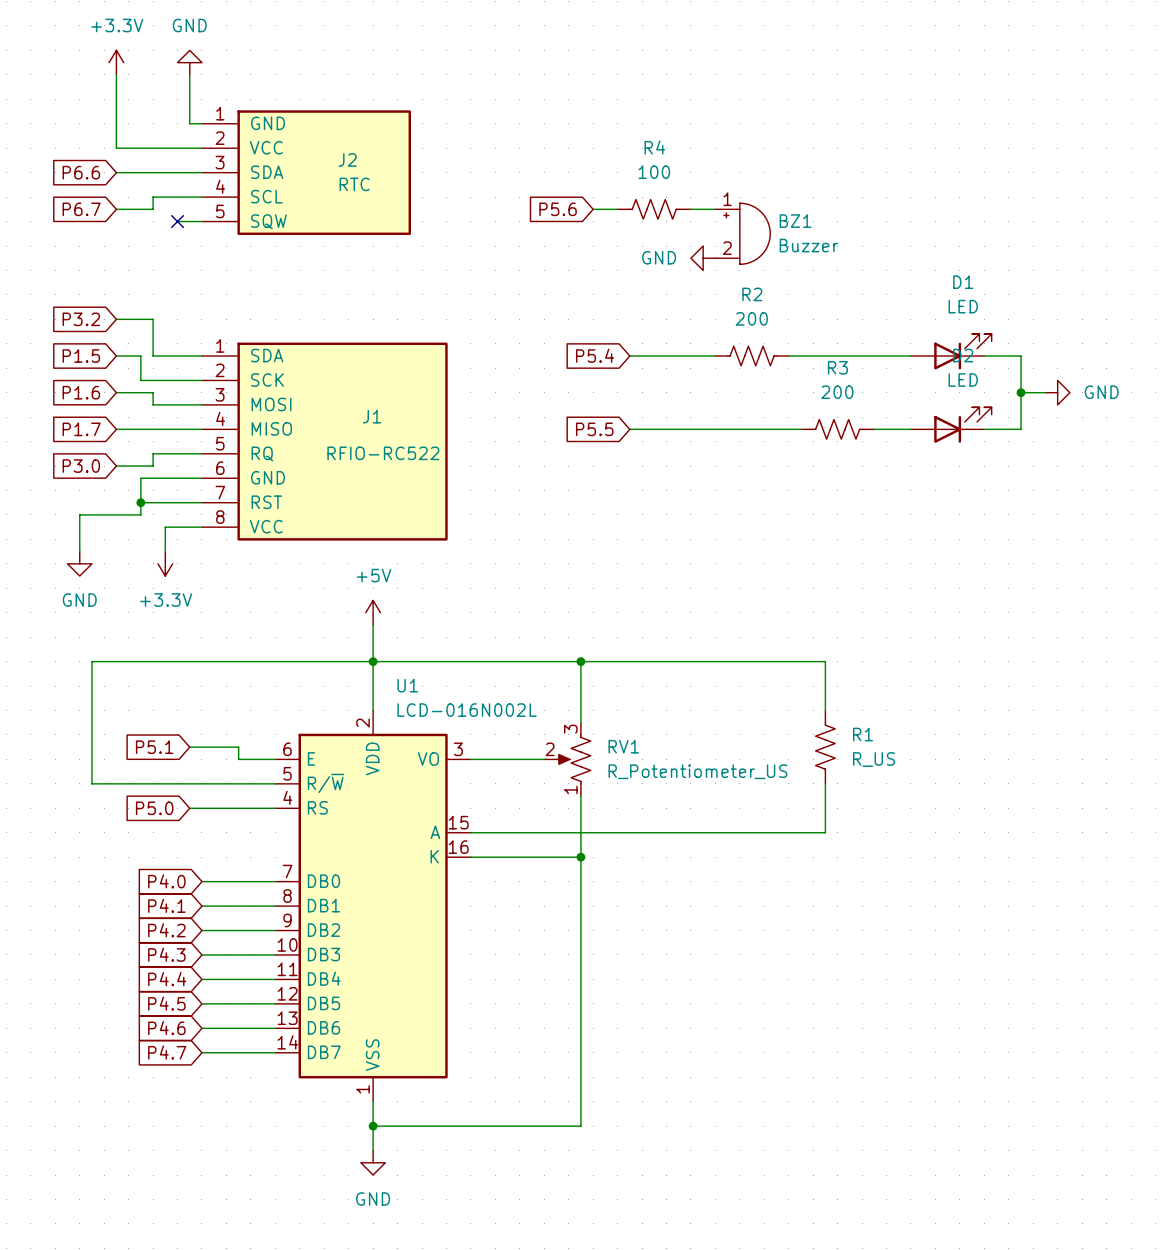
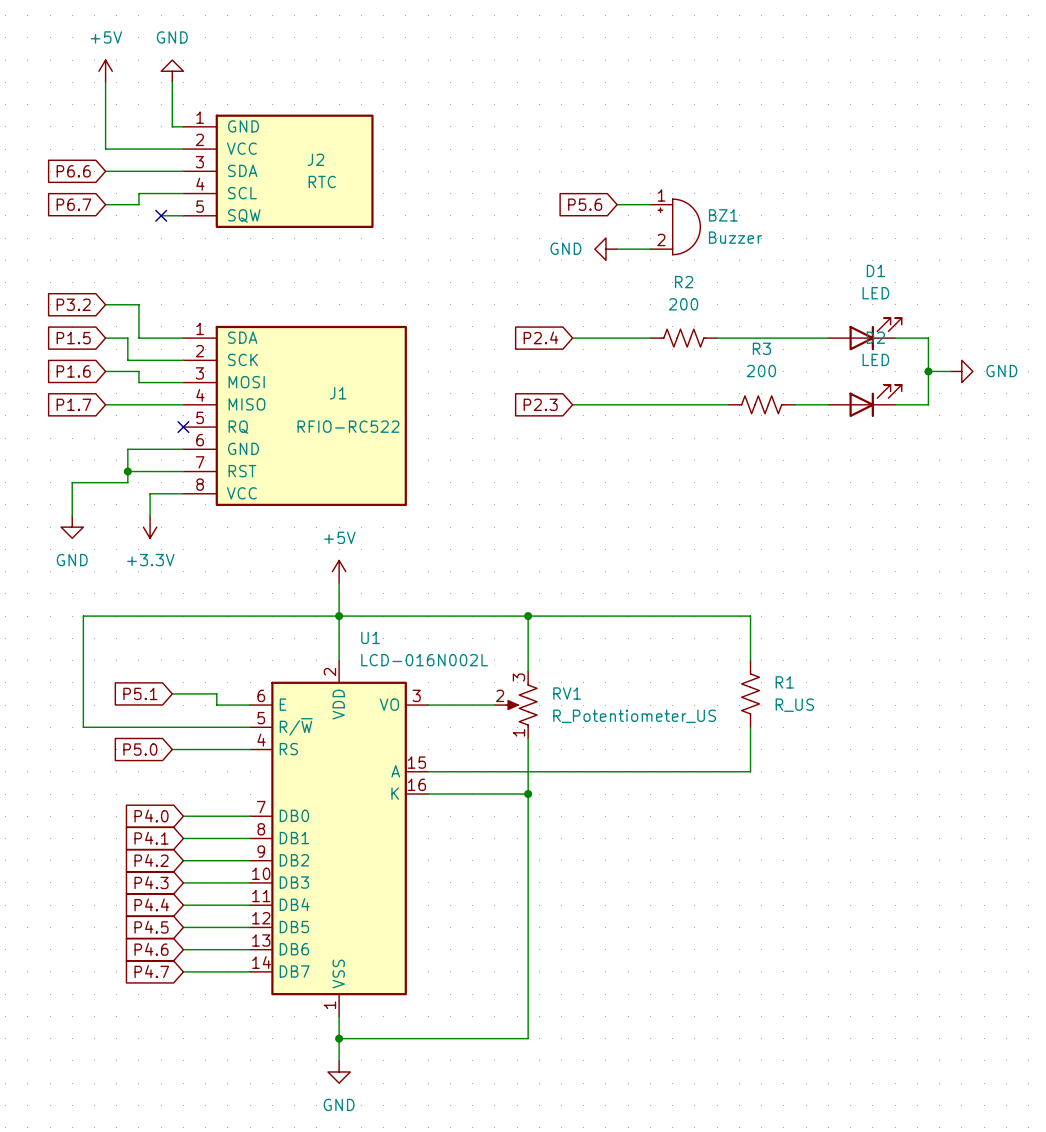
power symbol: +3.3V (116, 62) -> +5V (105, 71)
global label position: P5.6 (558, 209) -> P5.6 (585, 204)
wire: (593, 209) (617, 209) -> none
R4: 100 (654, 209) -> none
wire: none -> (617, 249) (650, 249)
power symbol position: GND (703, 258) -> GND (605, 249)
global label: P5.4 (595, 355) -> P2.4 (540, 337)
global label: P5.5 (594, 429) -> P2.3 (540, 404)
wire: (201, 453) (153, 453) (153, 466) (116, 466) -> none
no-connect mark: none -> (183, 427)
global label: P3.0 (81, 466) -> none

